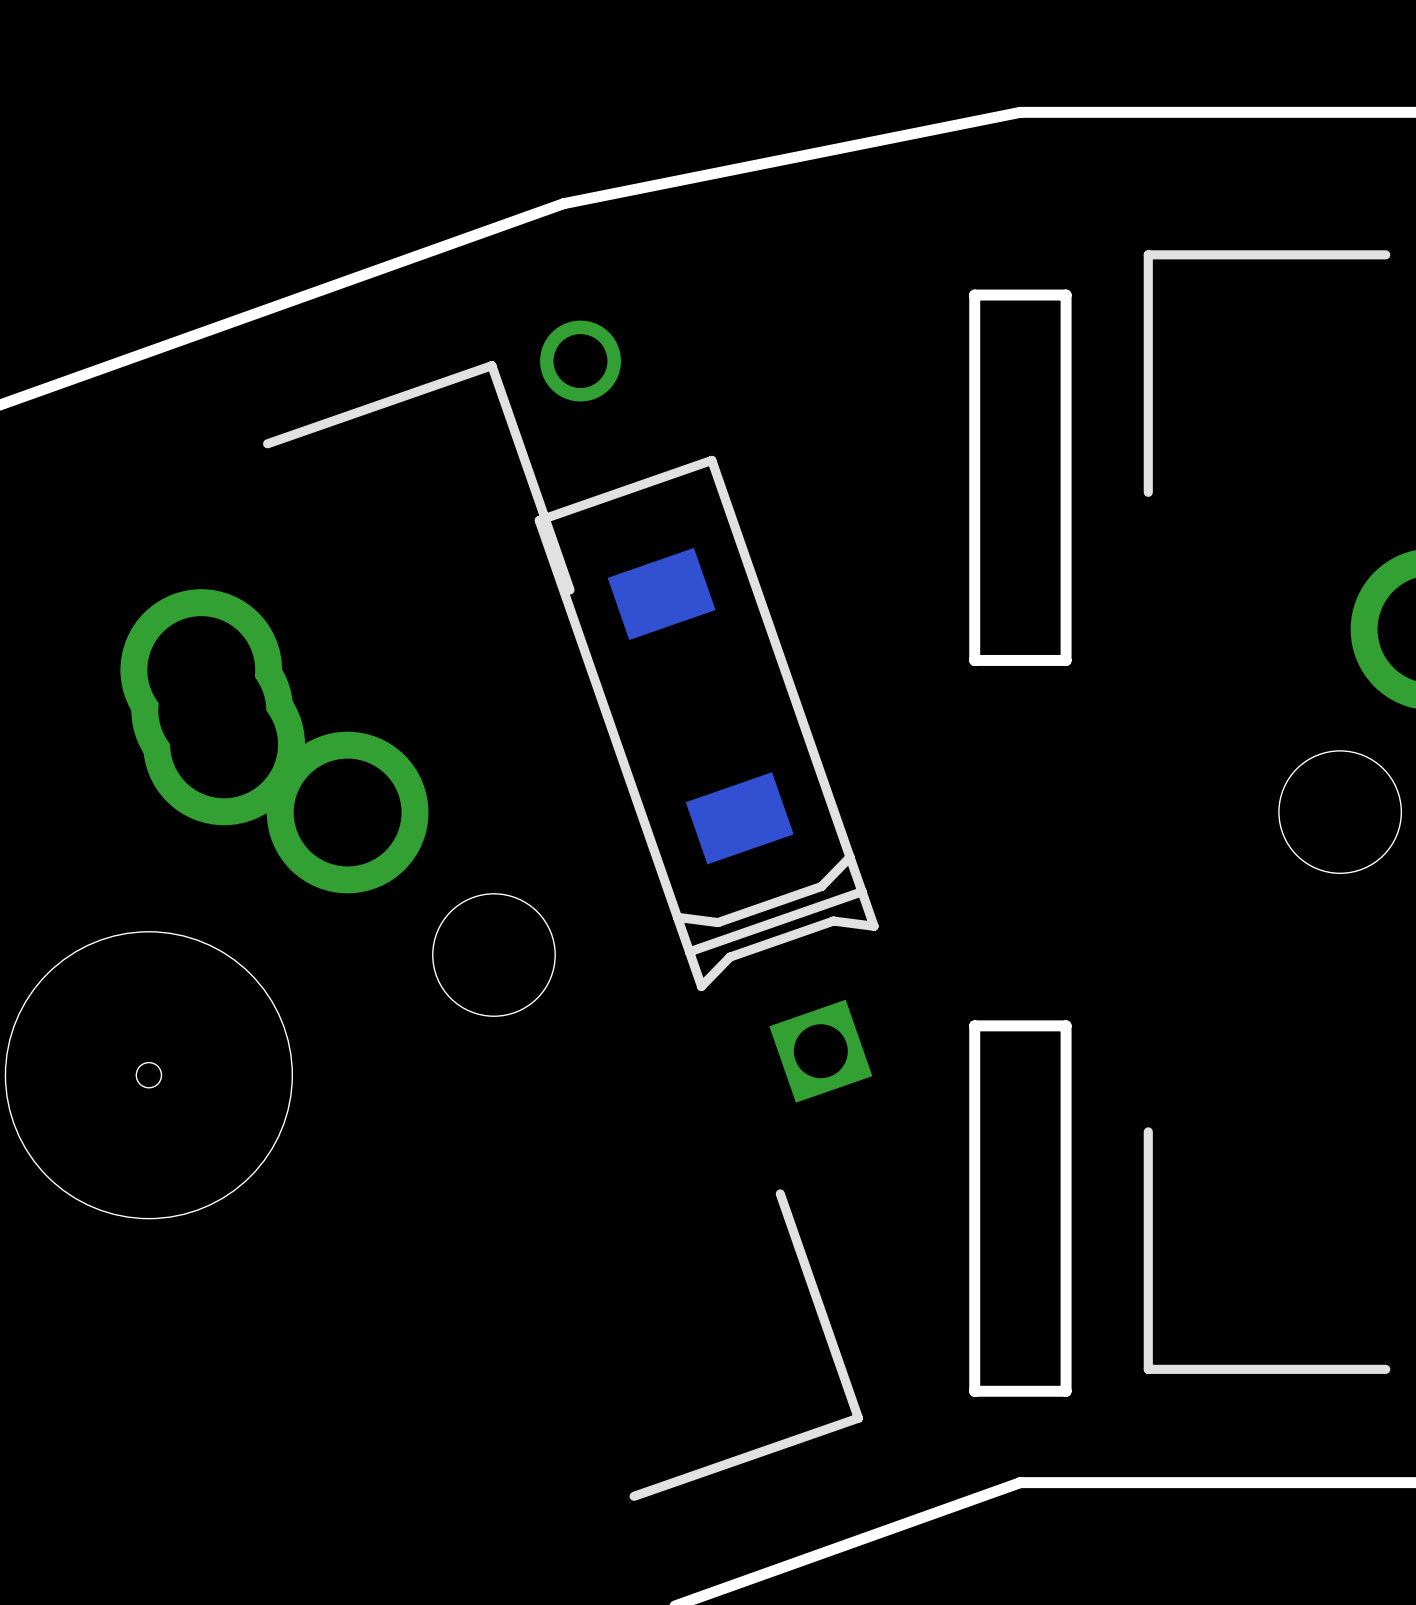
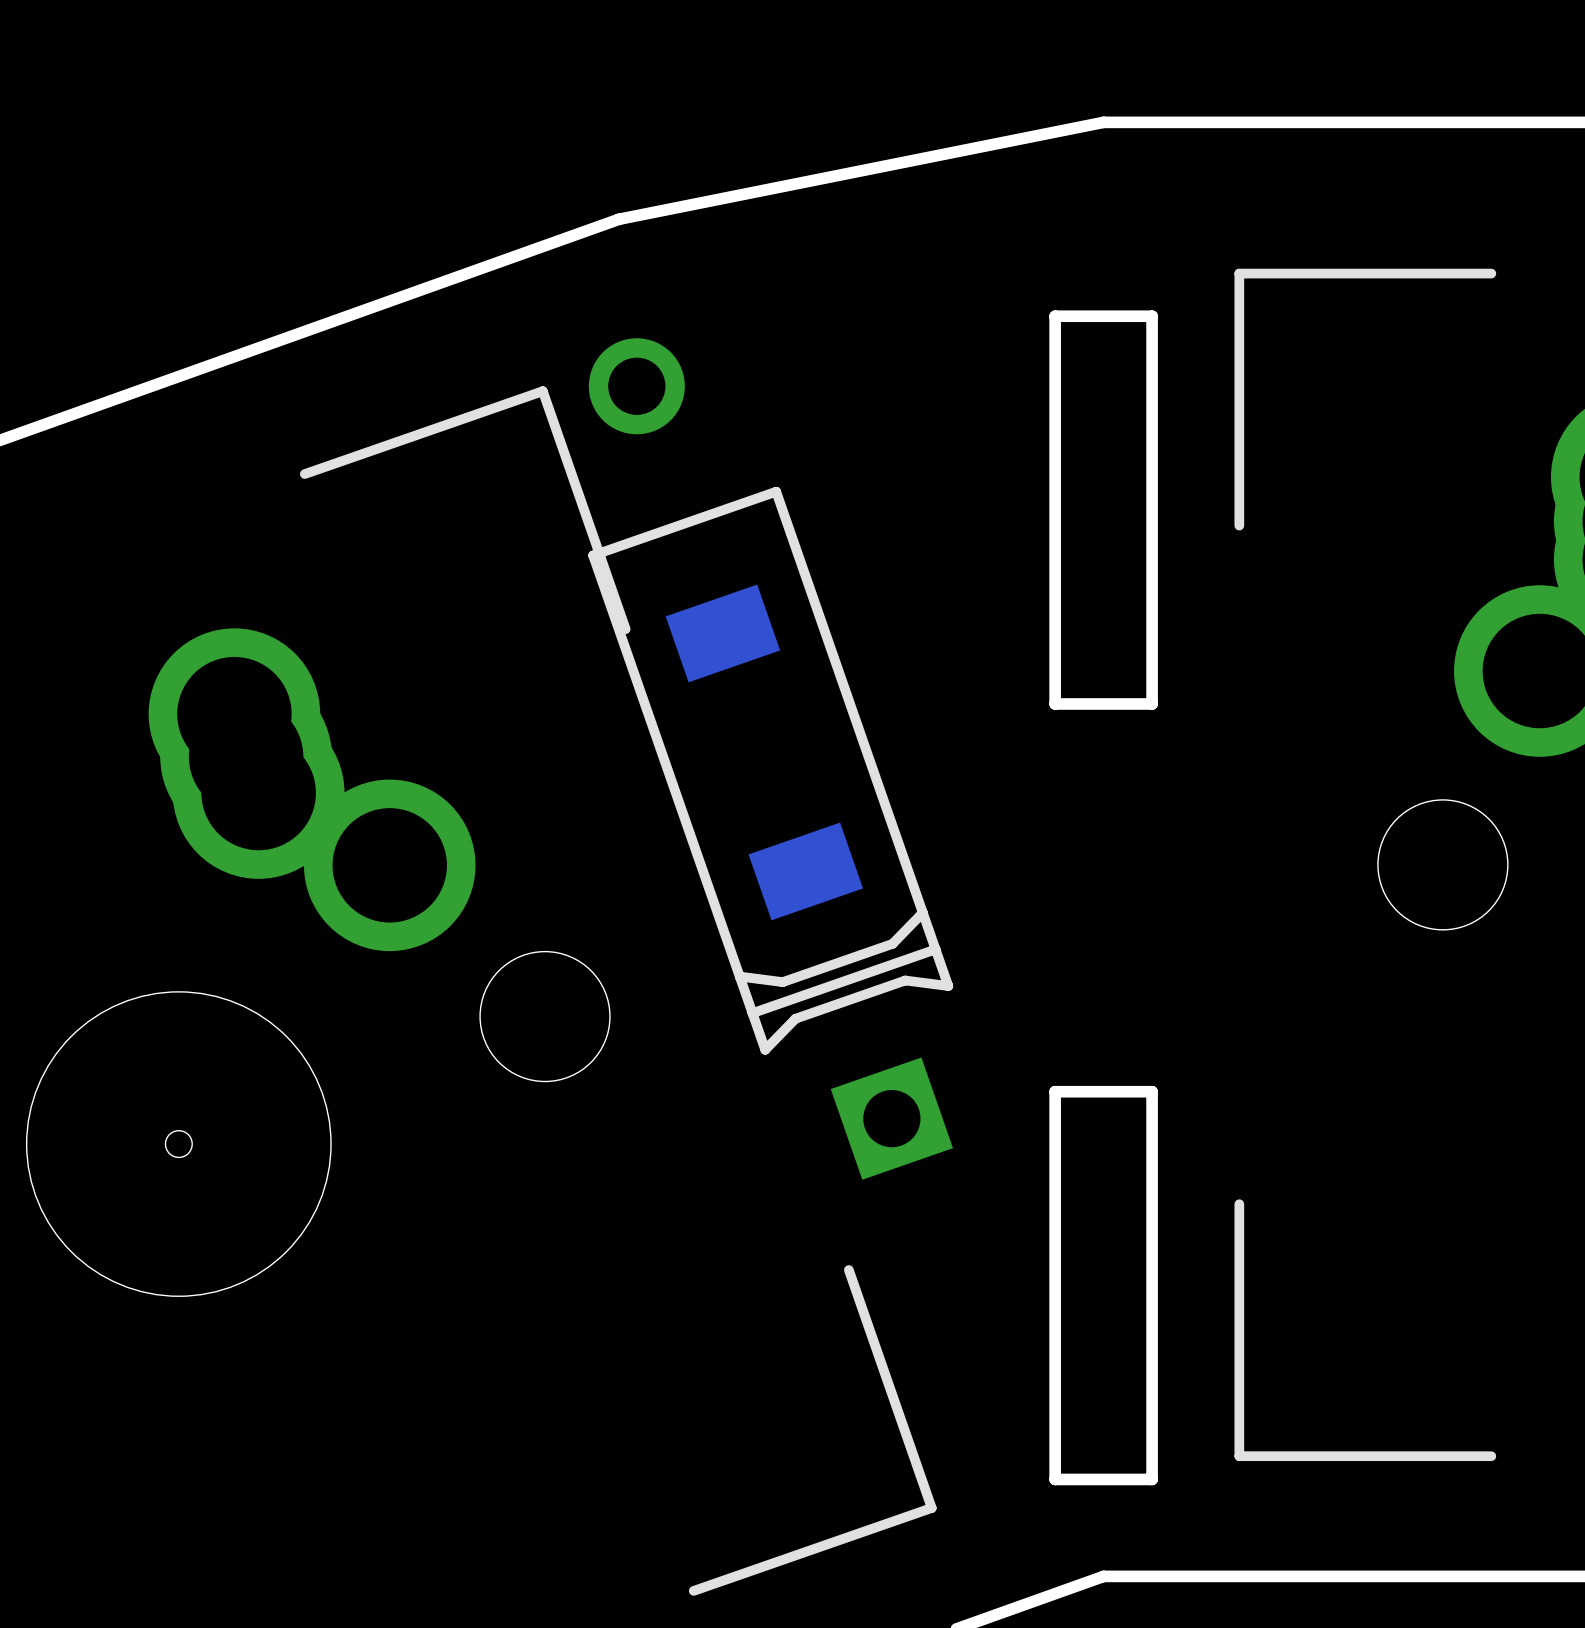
part footprint: [534, 320, 879, 1103] -> [588, 338, 954, 1180]

